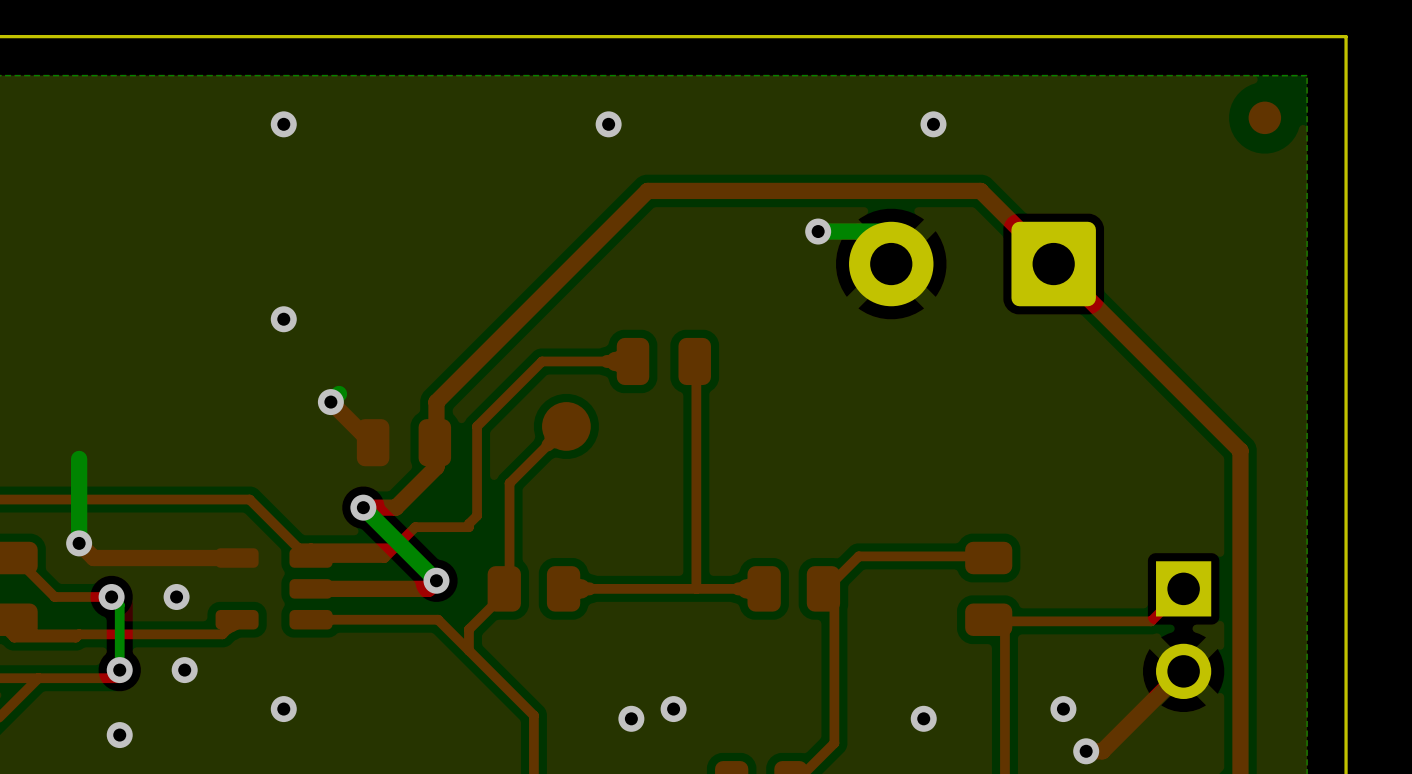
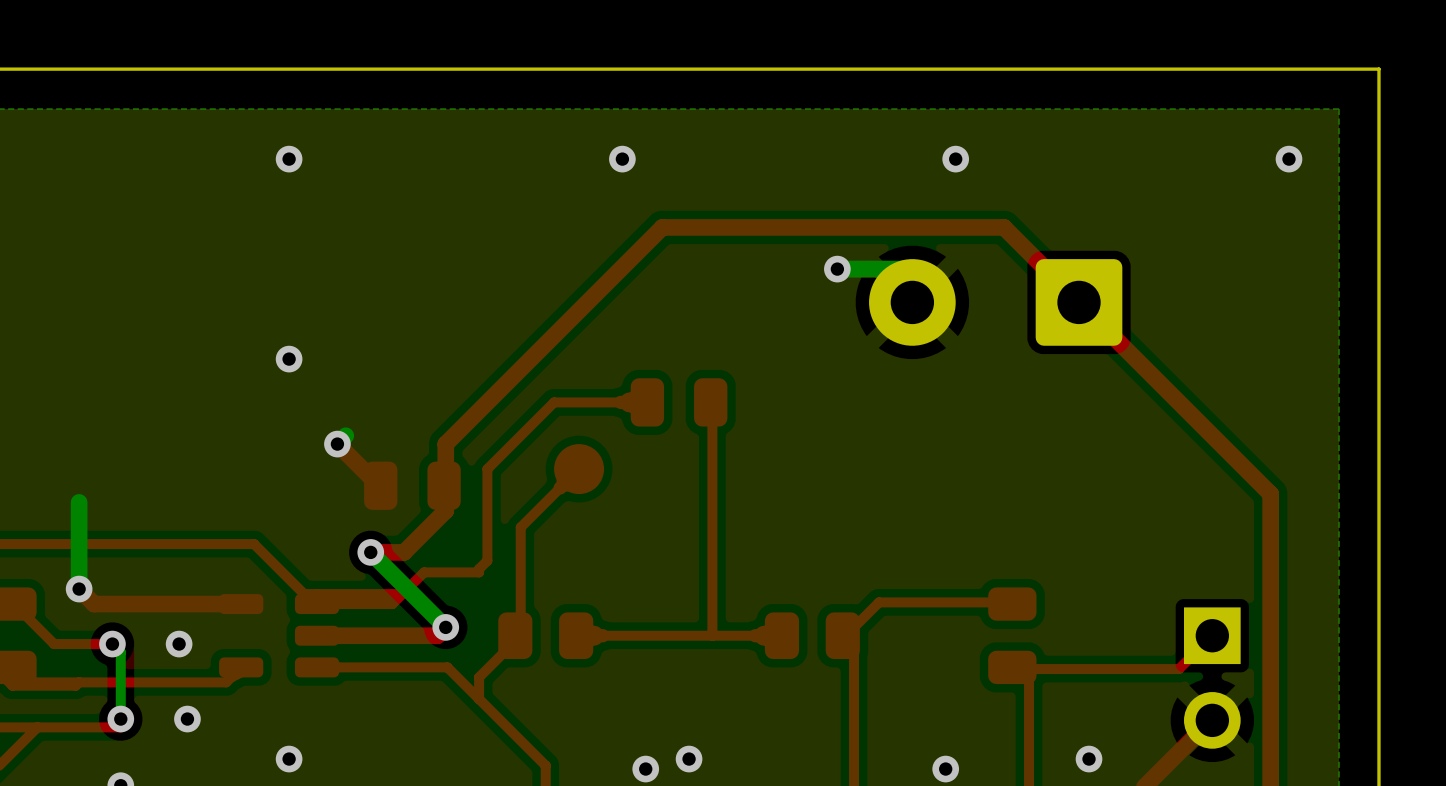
part: (1264, 117) -> none
via: none -> (1288, 159)

